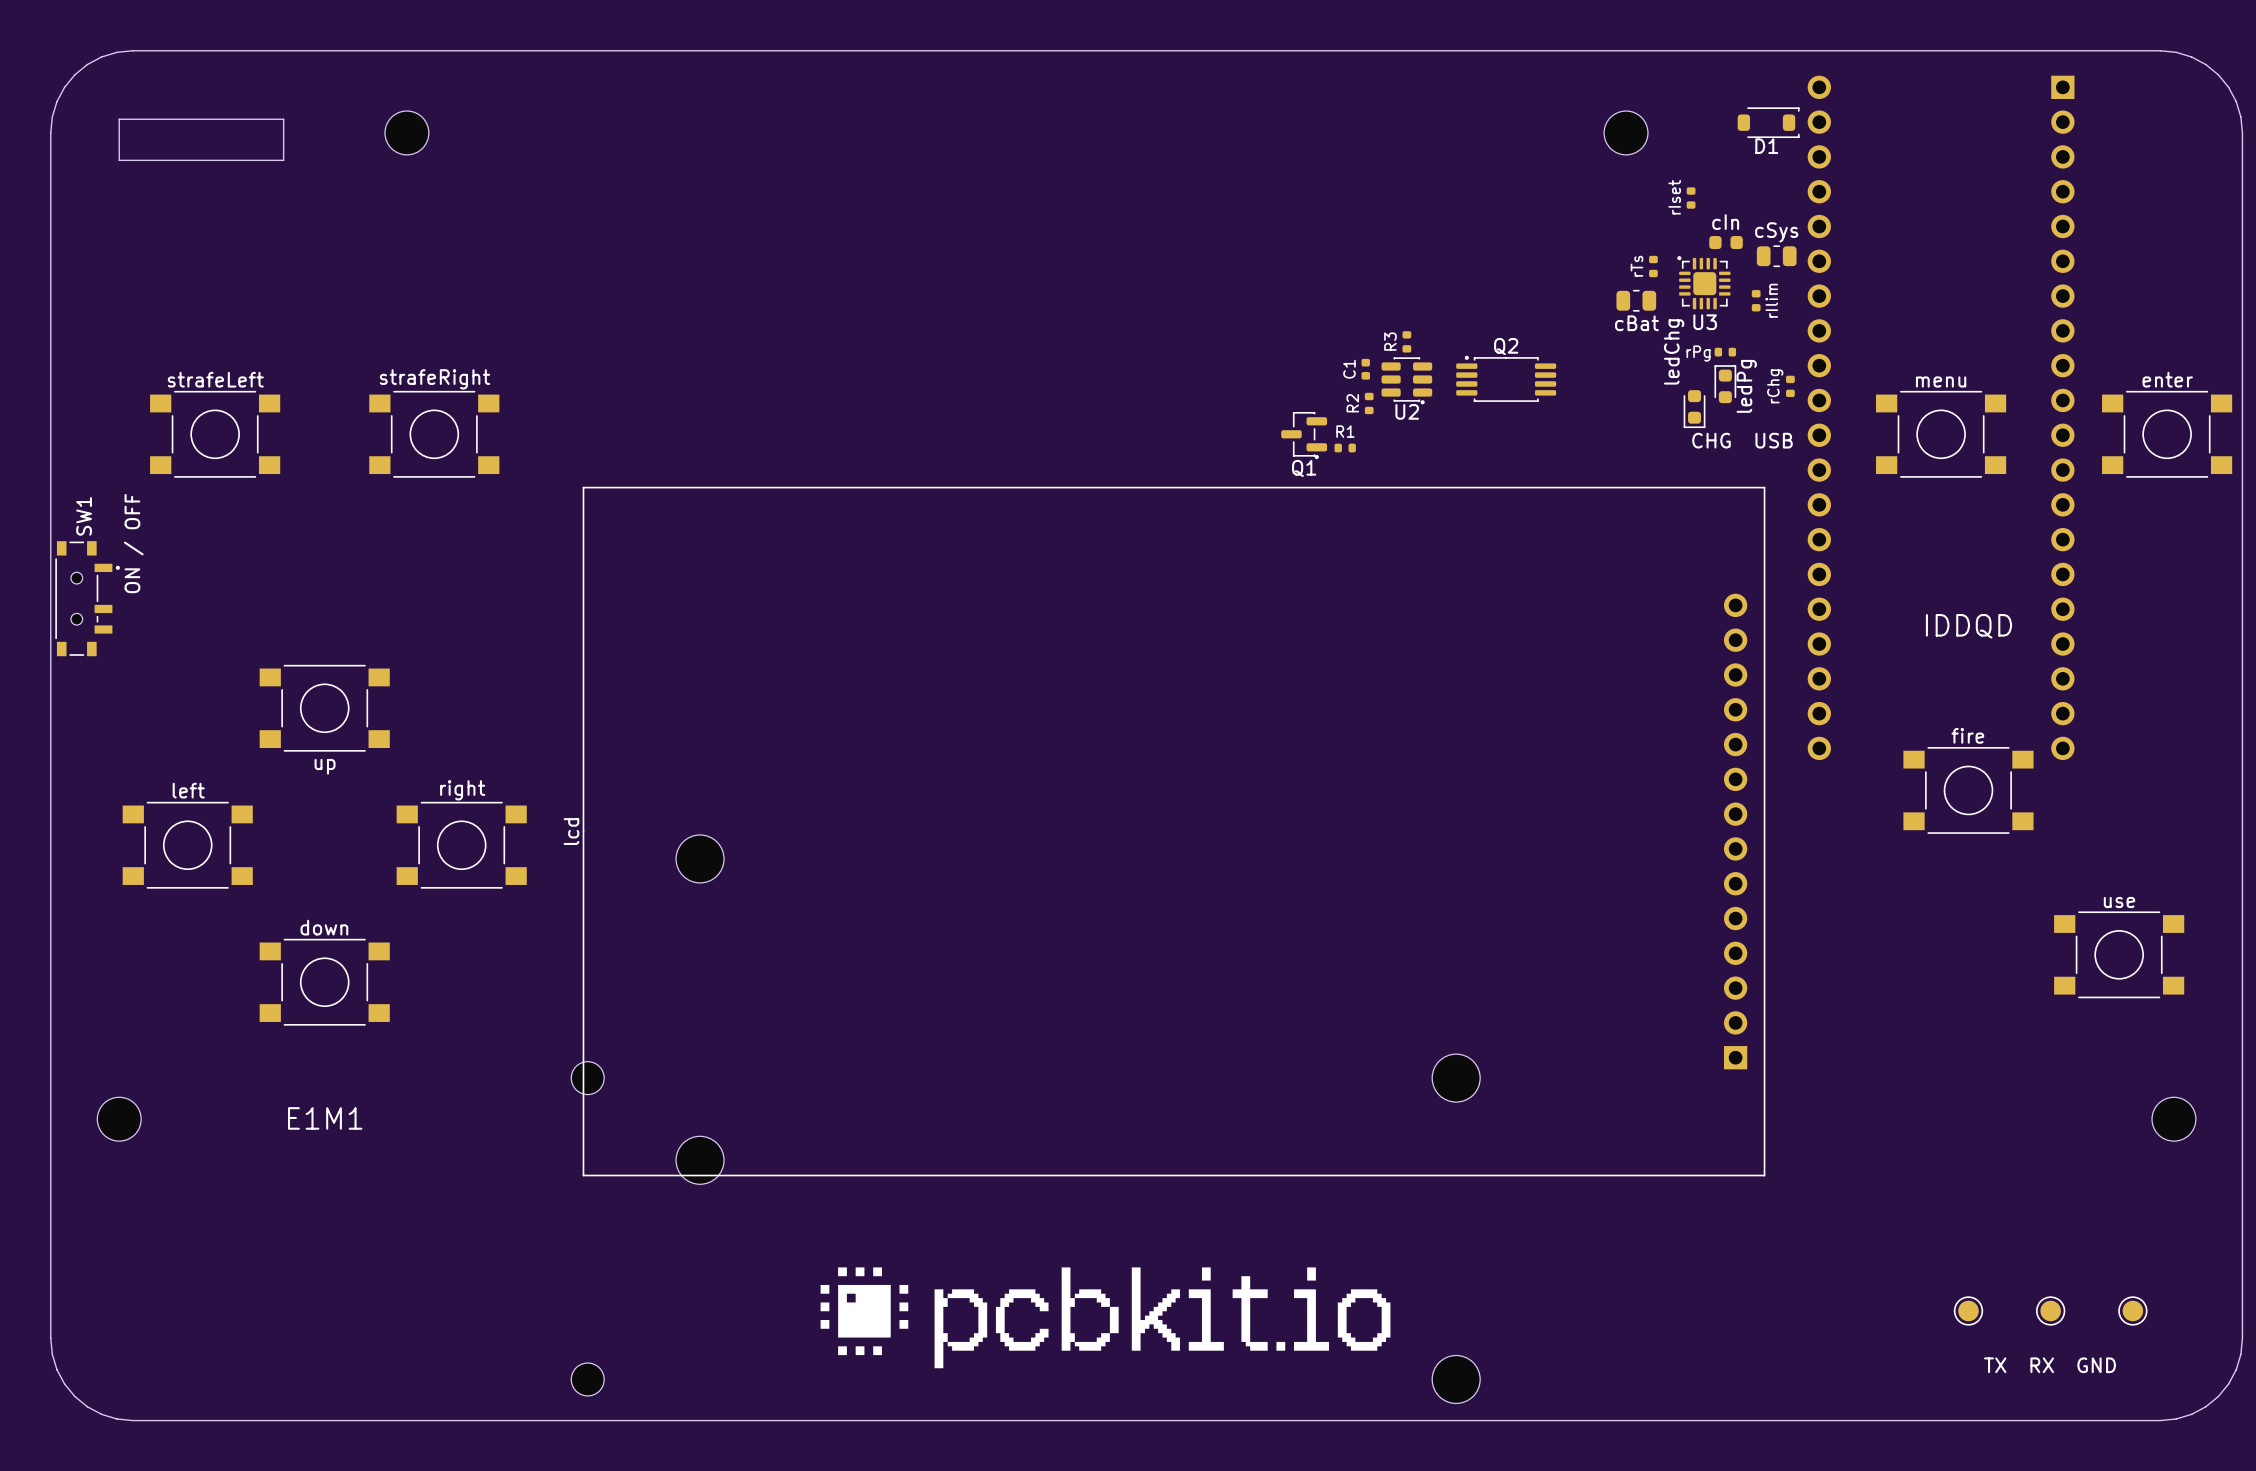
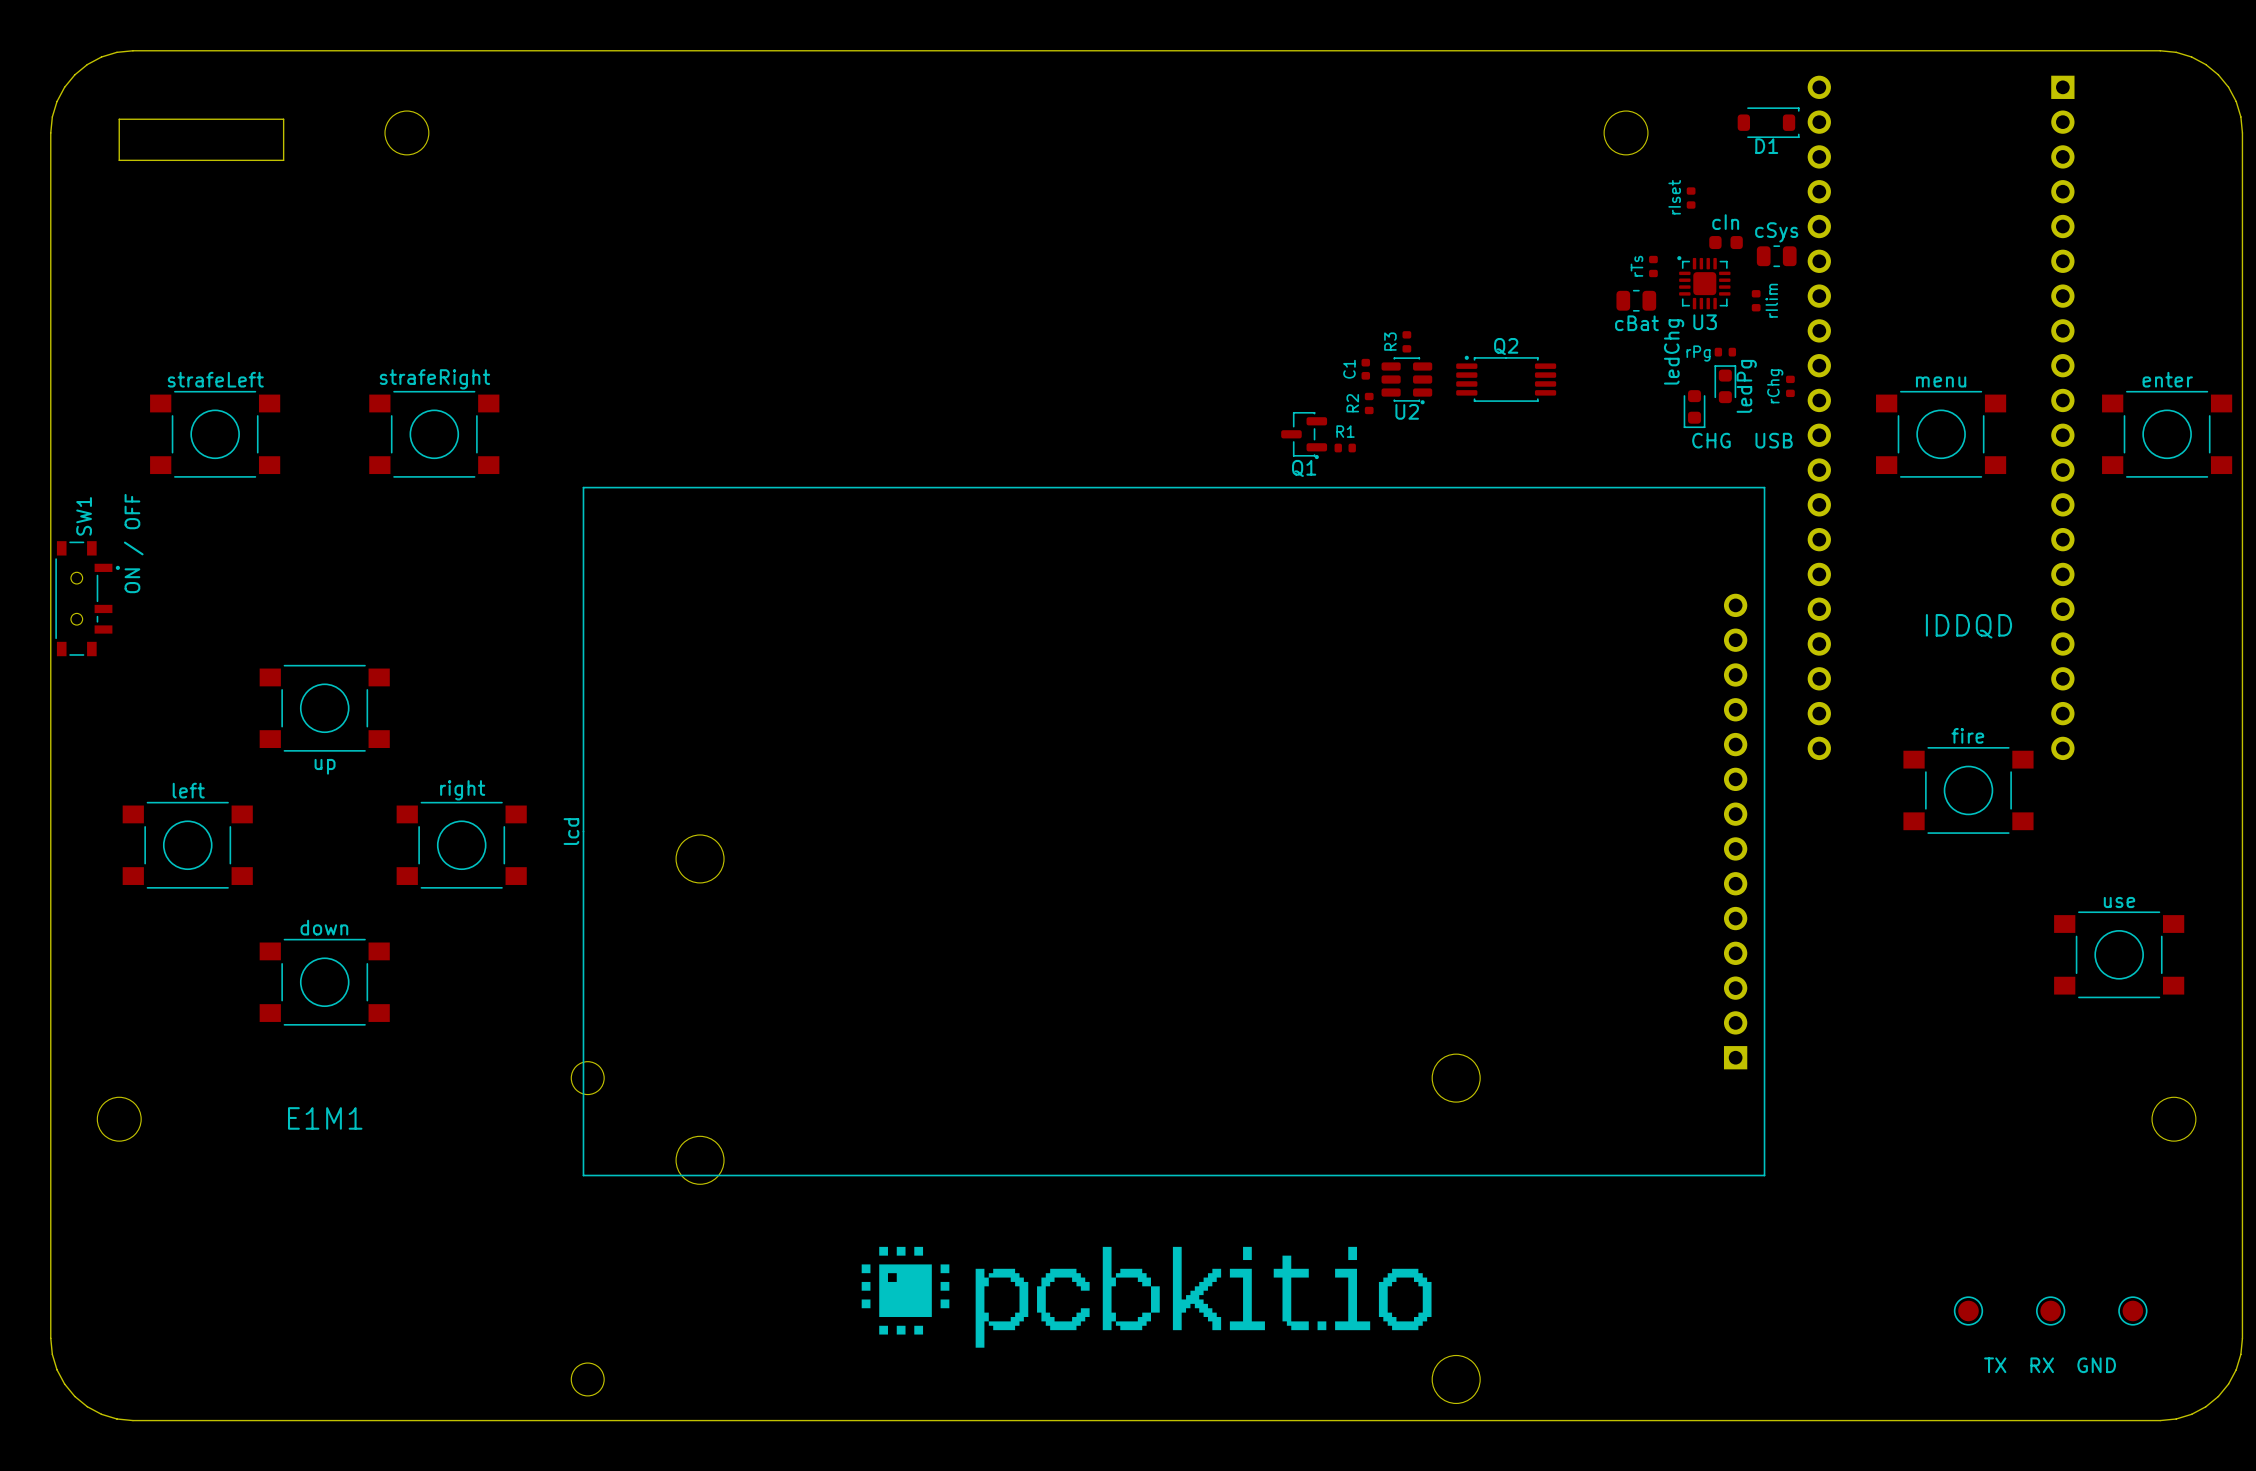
drawing position: (1105, 1317) -> (1146, 1297)

